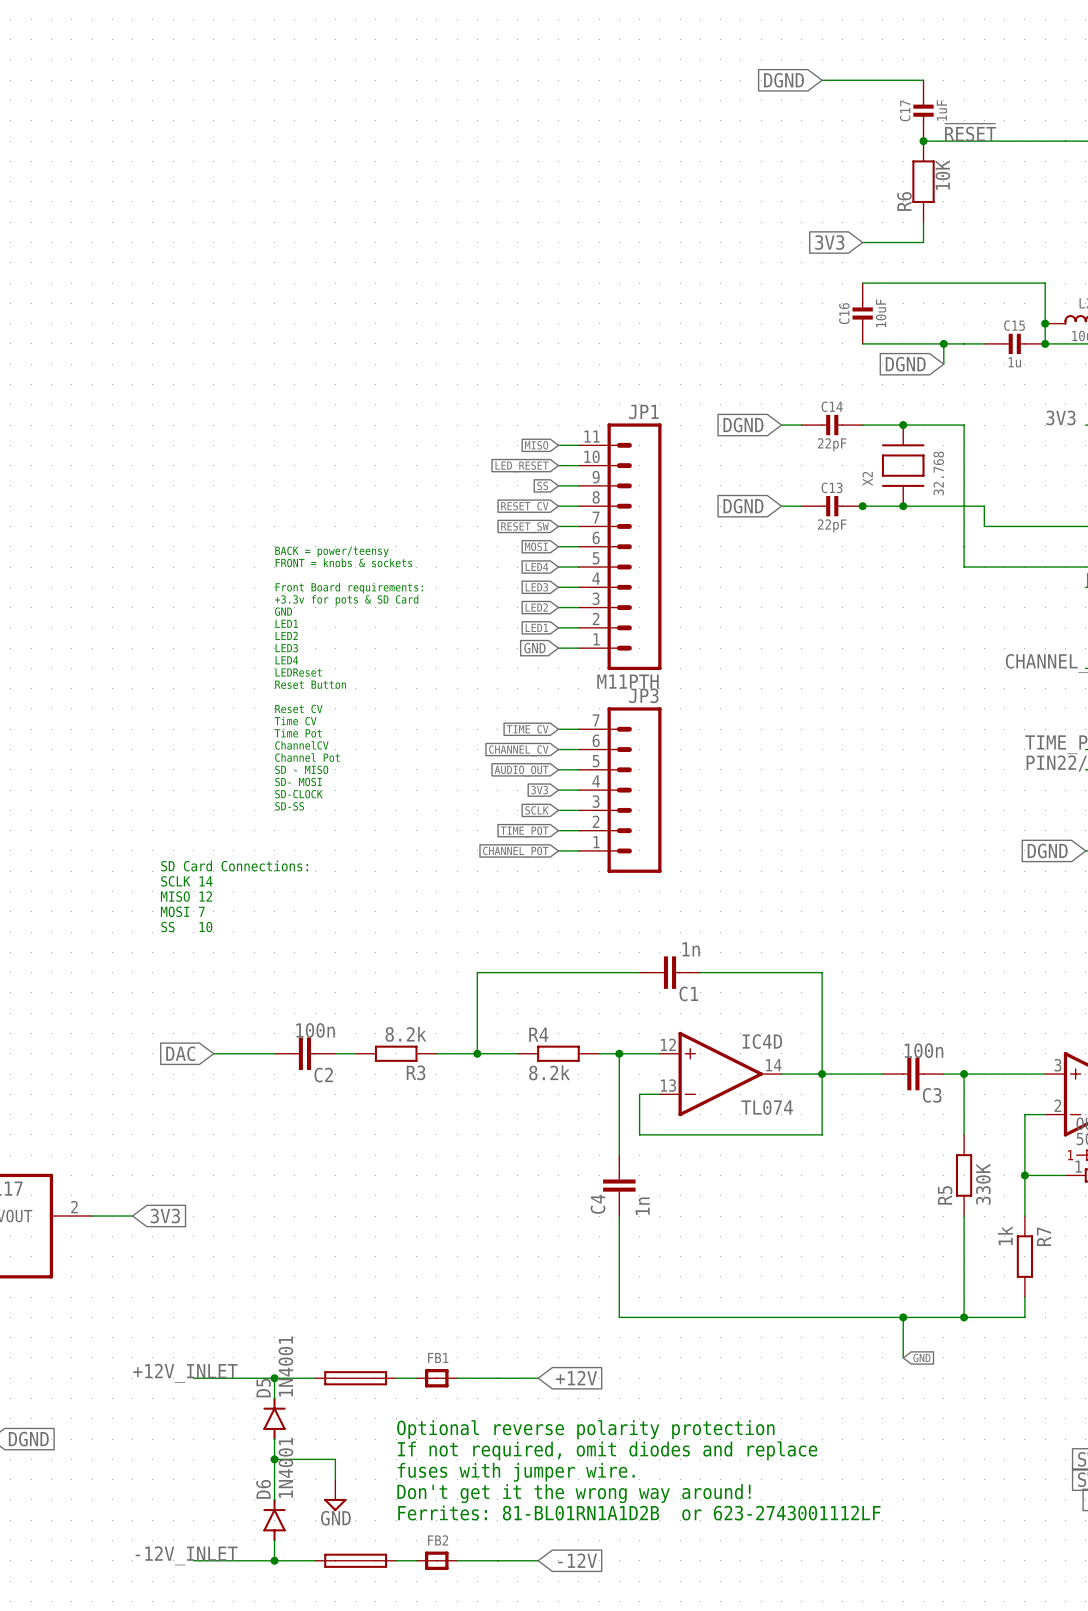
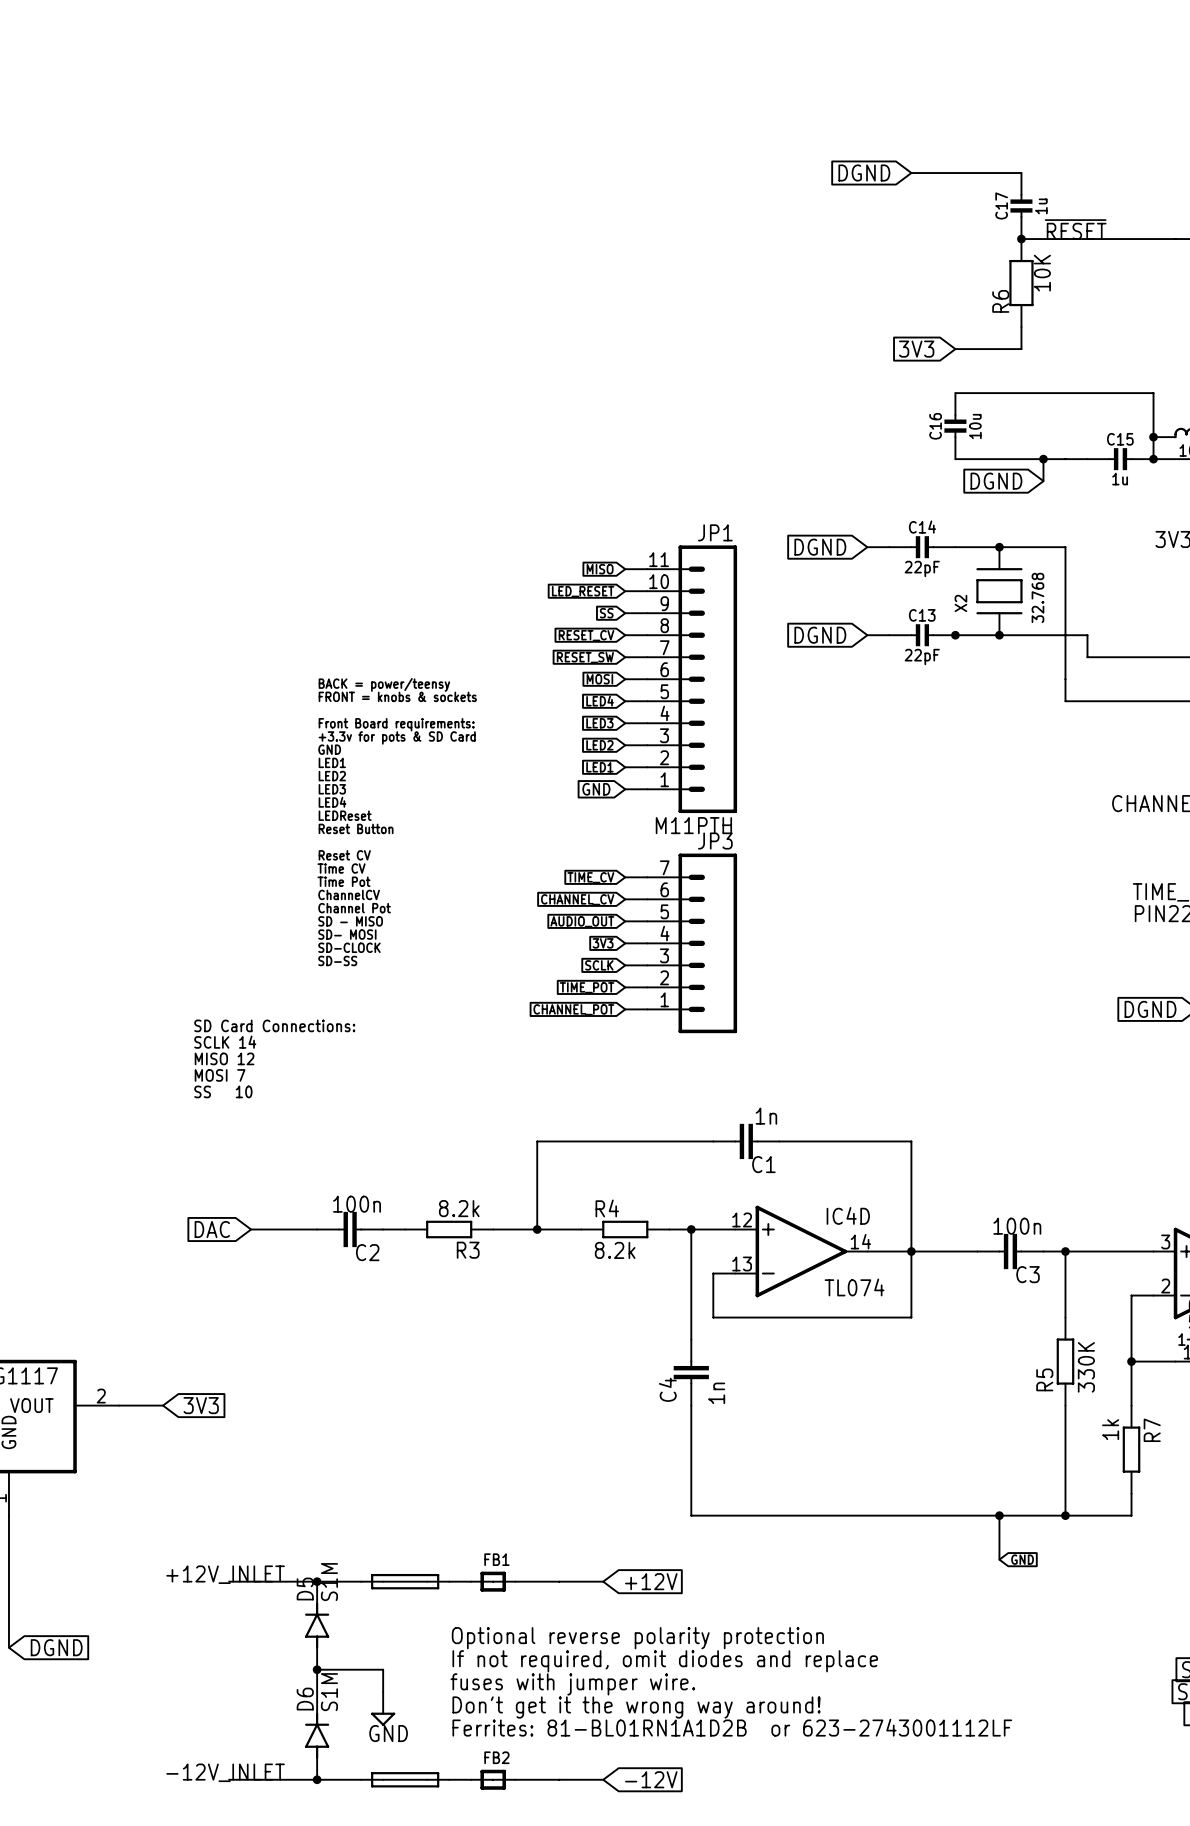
C17 value: 1uF (941, 110) -> 1u (1041, 206)
C16 value: 10uF (881, 313) -> 10u (975, 426)
D5 value: 1N4001 (285, 1366) -> S1M (329, 1582)
D6 value: 1N4001 (285, 1467) -> S1M (329, 1692)

